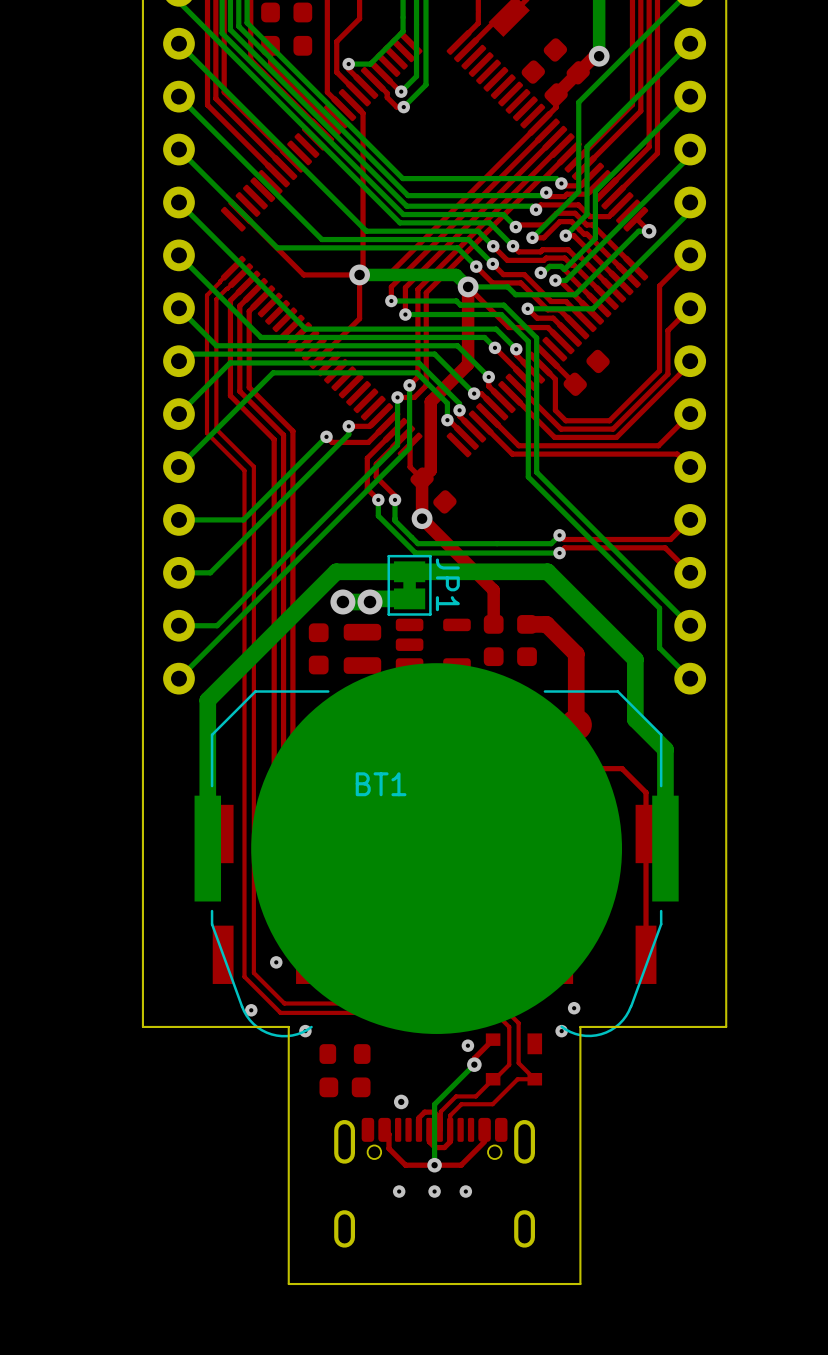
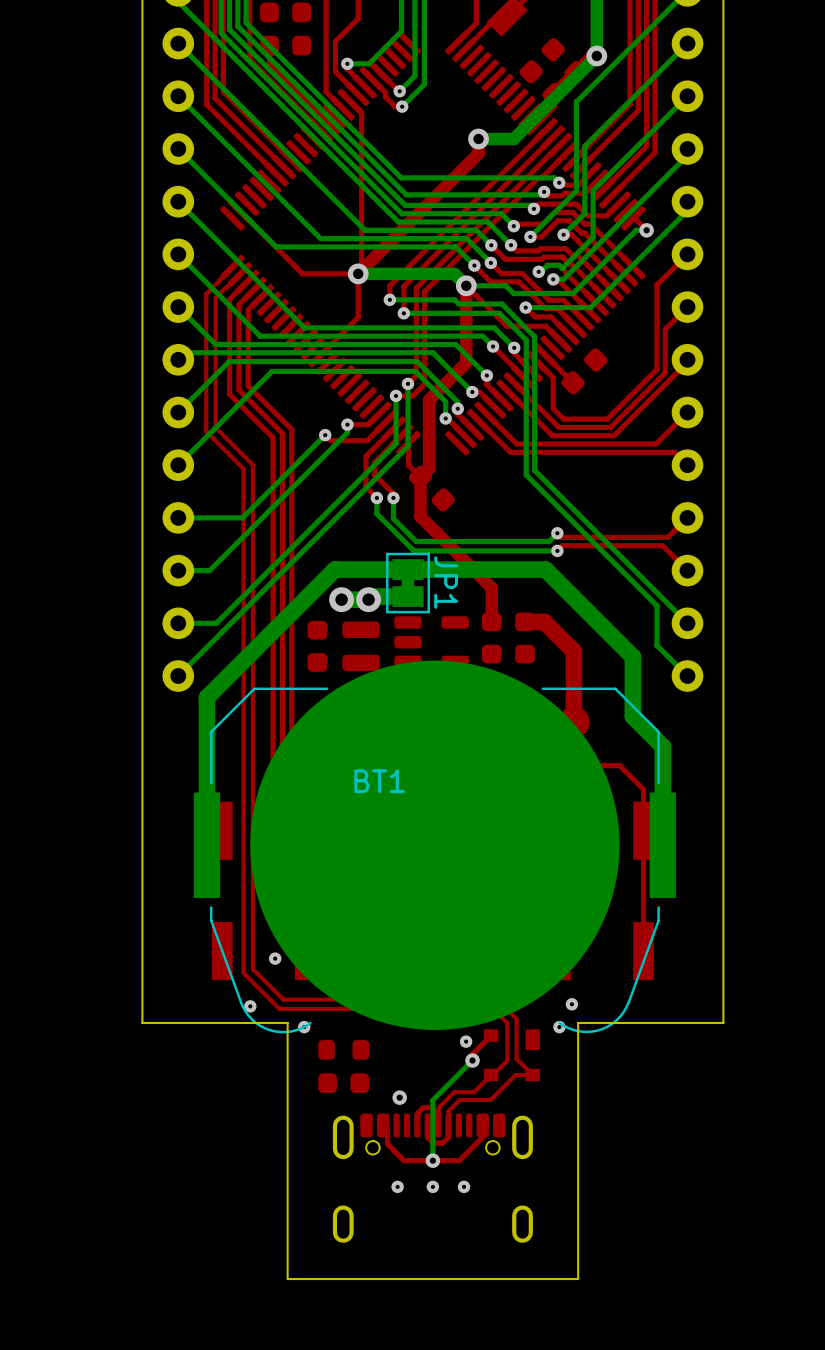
bottom track: none -> (596, 56) (513, 139) (478, 139)
top track: (540, 123) (388, 274) (359, 274) -> (478, 139) (478, 153) (358, 273)
via: none -> (478, 139)
via: (422, 518) -> none

